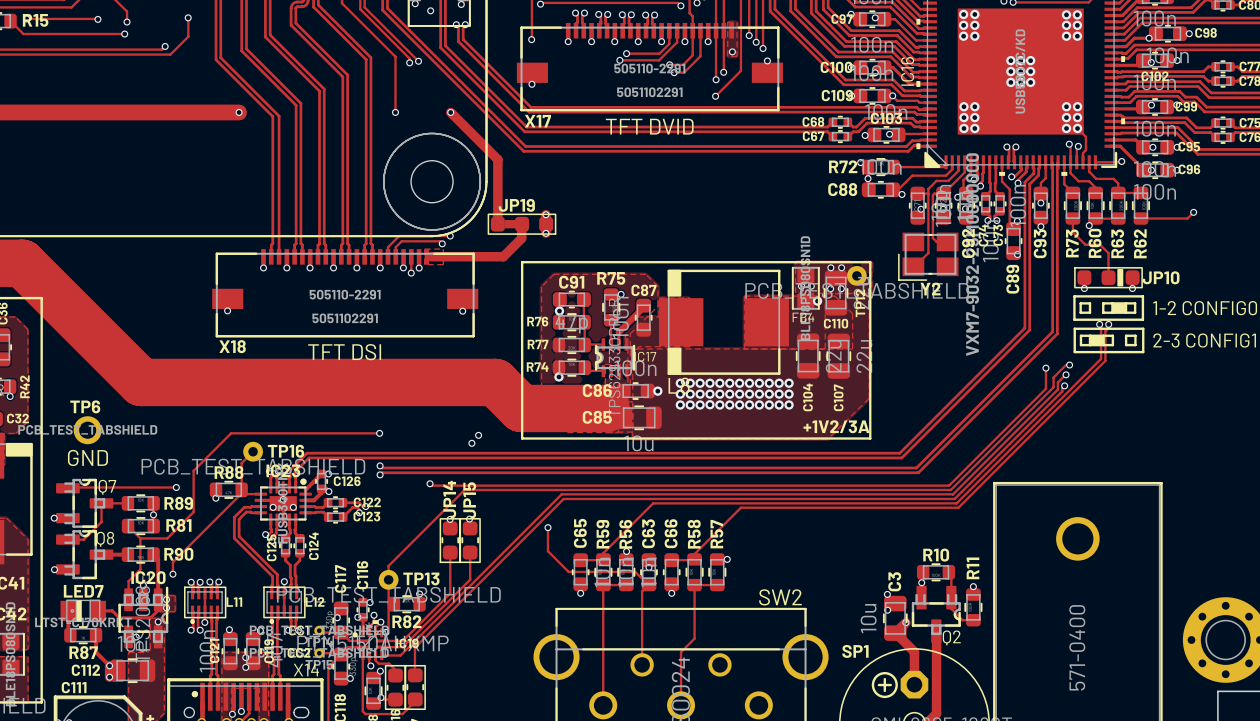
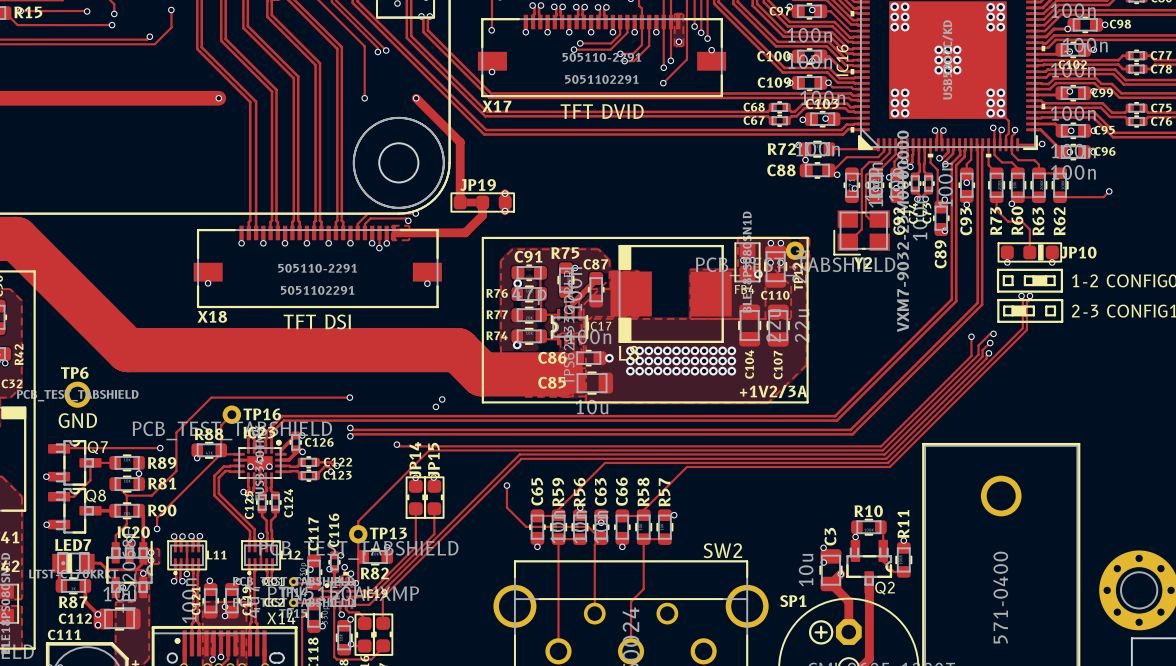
track: none -> (1015, 130) (1011, 136) (1011, 144)
via: none -> (1015, 130)

